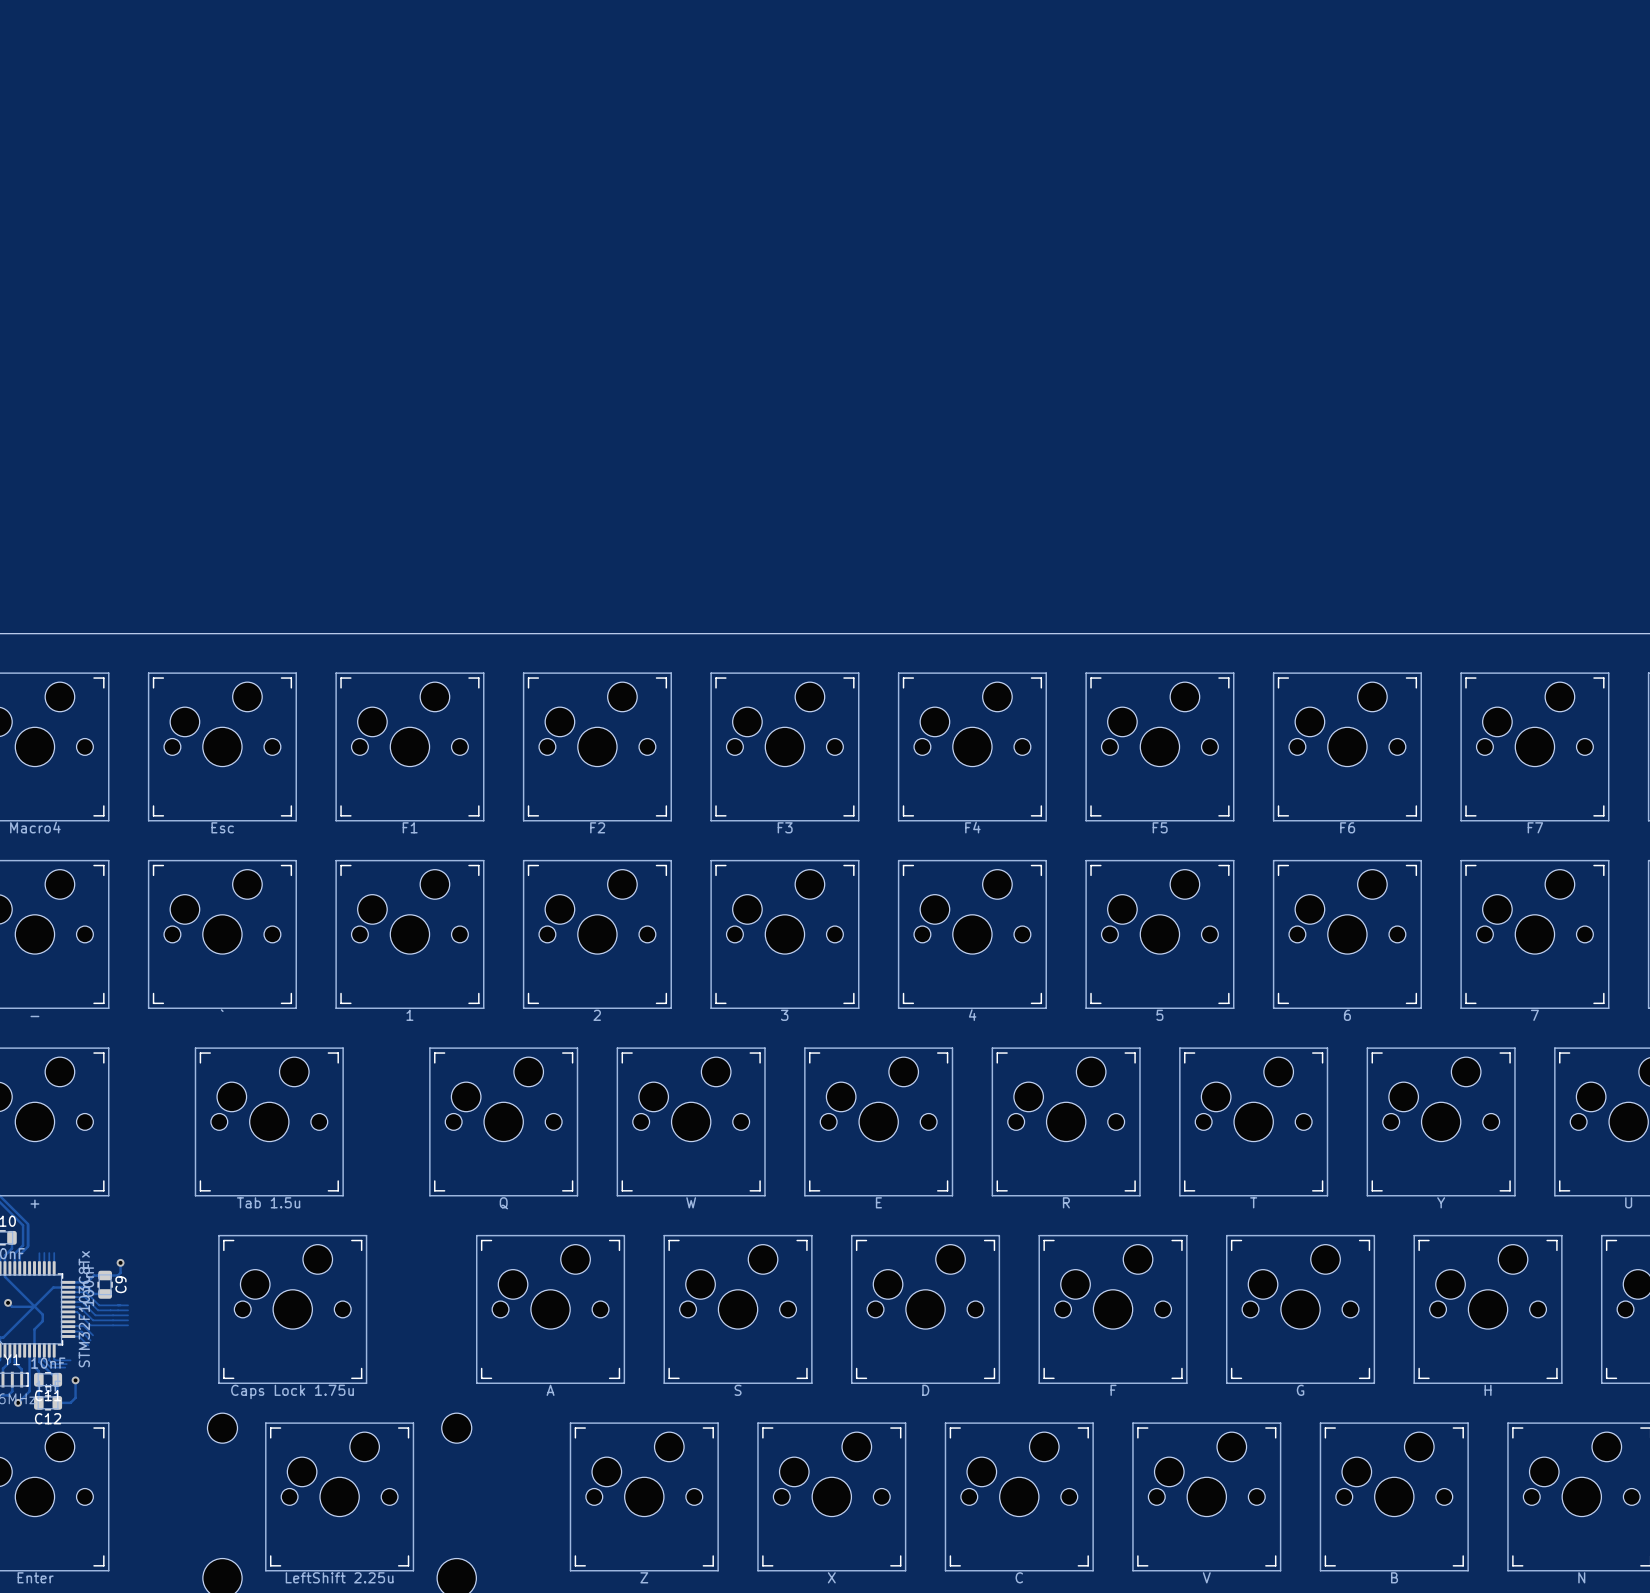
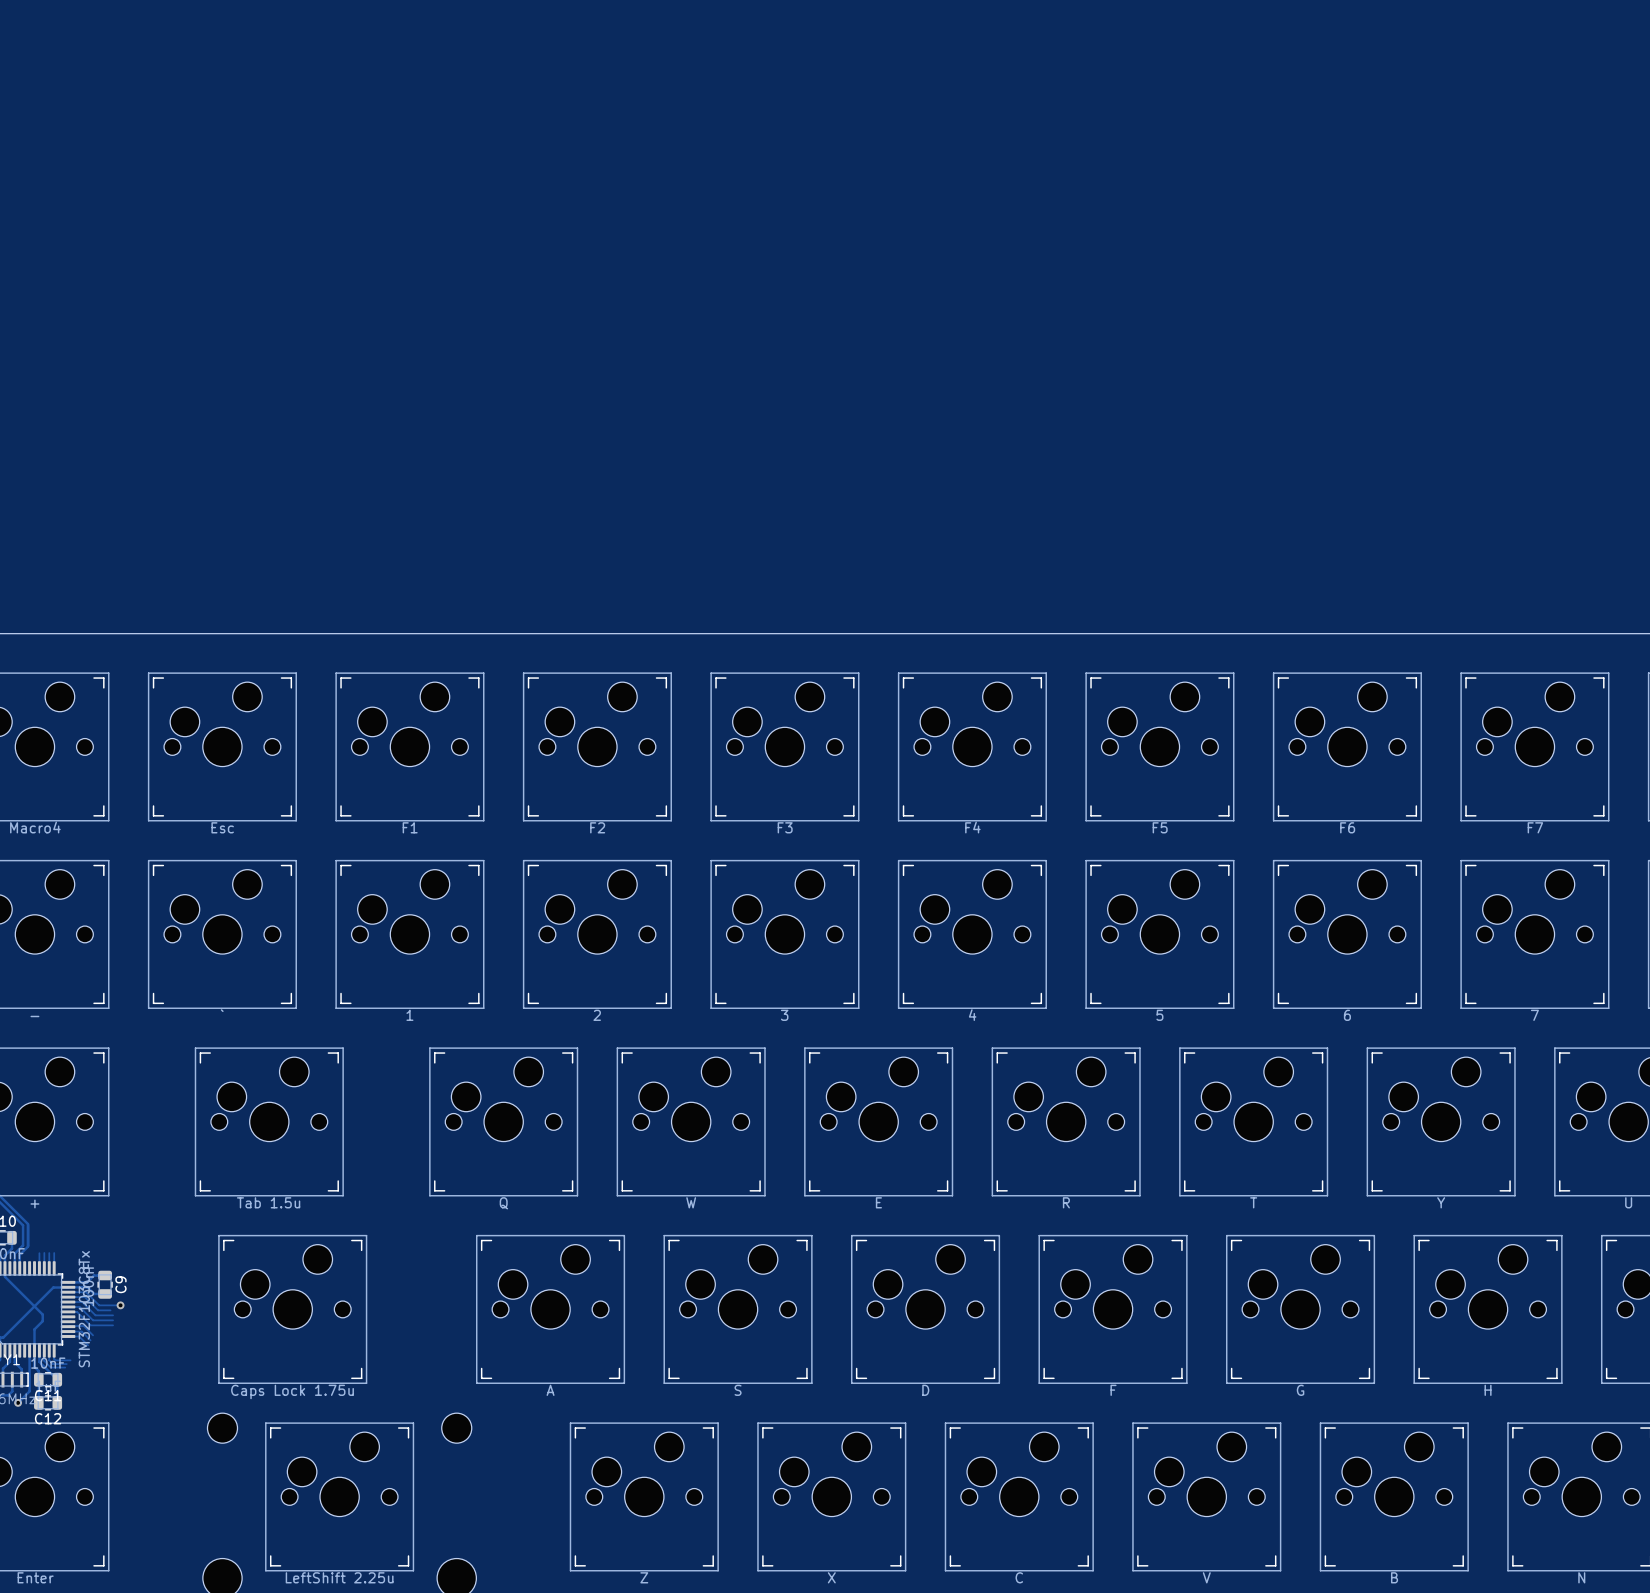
track: (120, 1262) (120, 1272) (117, 1275) (105, 1275) -> none
via position: (120, 1262) -> (120, 1305)
track: (8, 1302) (11, 1306) (34, 1306) -> none
via: (8, 1302) -> none
track: (120, 1305) (128, 1305) -> none
track: (110, 1310) (128, 1310) -> none
track: (113, 1315) (128, 1315) -> none
track: (113, 1320) (128, 1320) -> none
track: (113, 1325) (128, 1325) -> none
track: (75, 1380) (75, 1397) (70, 1402) (57, 1402) -> none
via: (75, 1380) -> none

